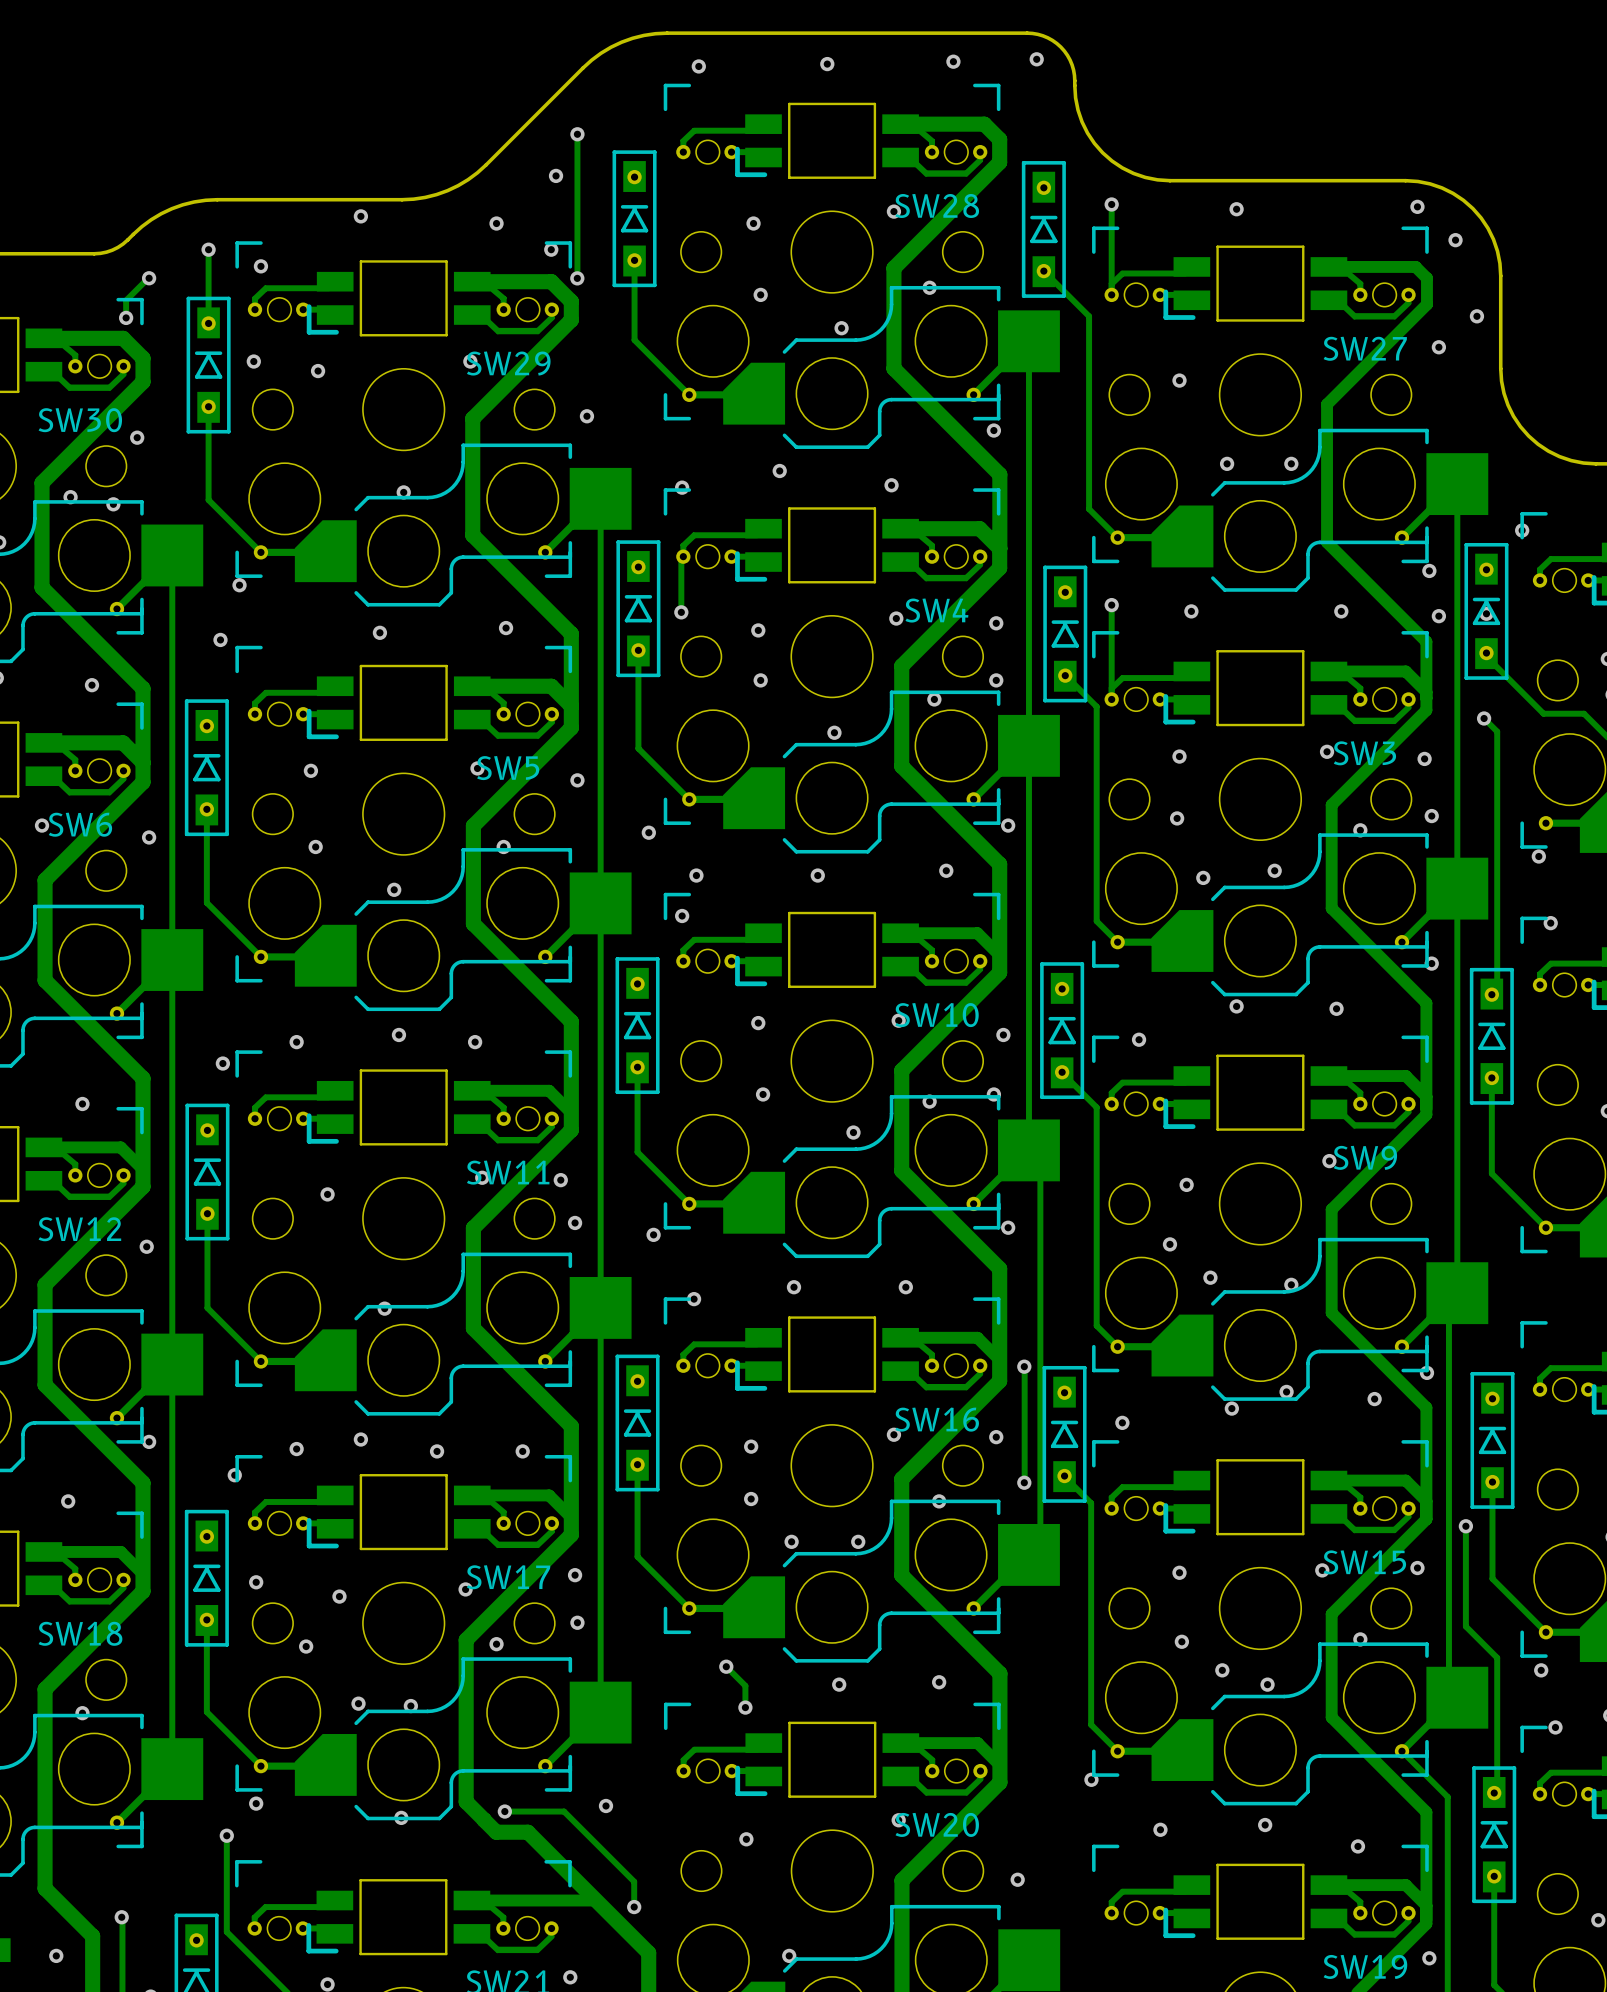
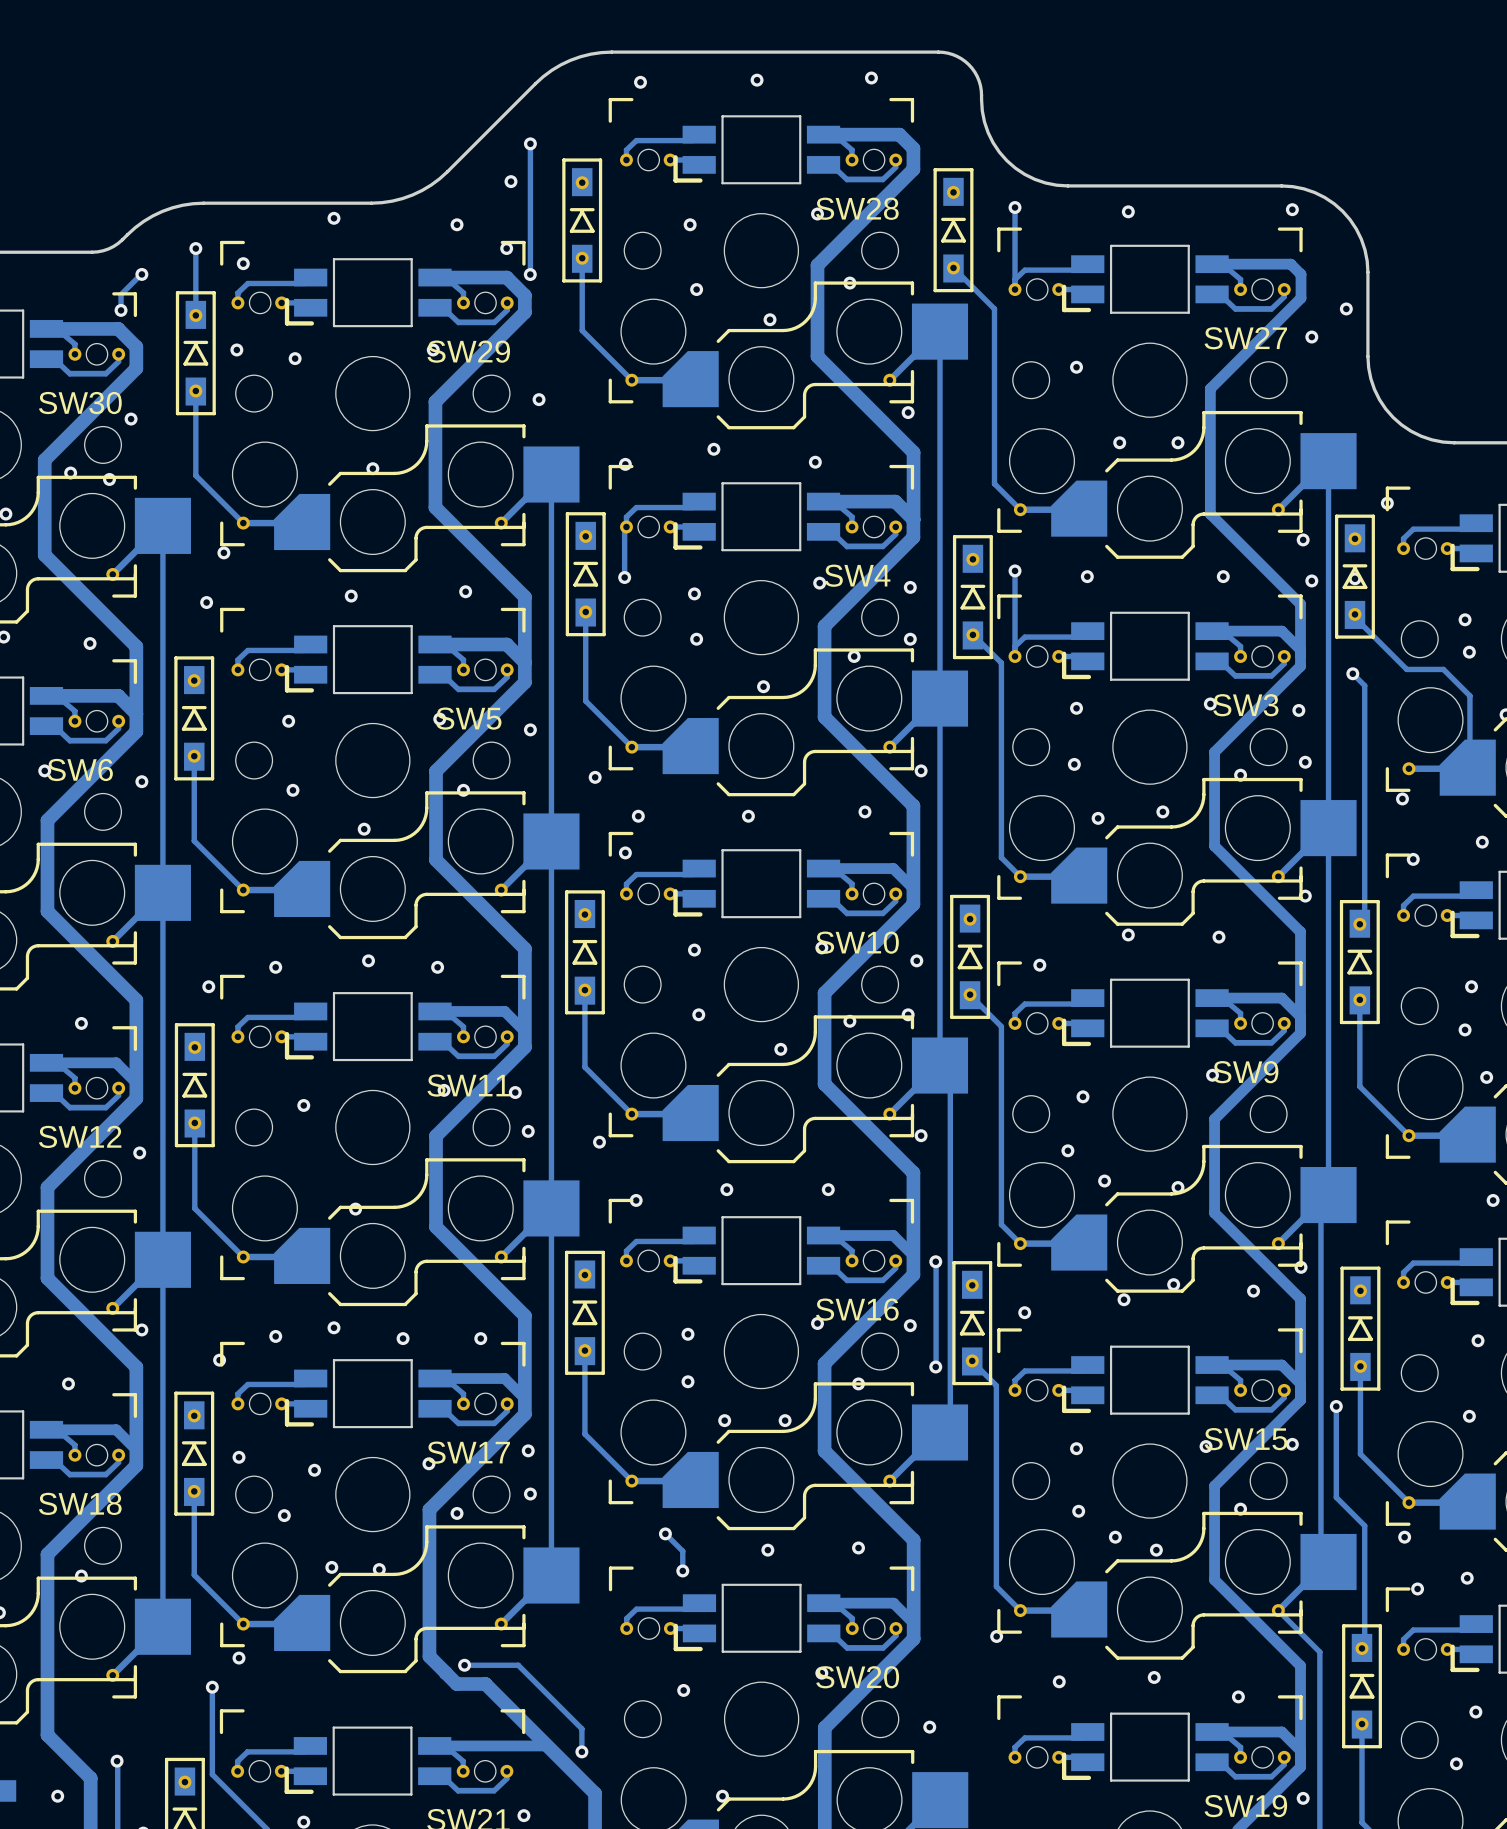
via: (1036, 59) -> none
via: (1455, 240) -> none
via: (606, 1805) -> none
via: (401, 1817) -> none

